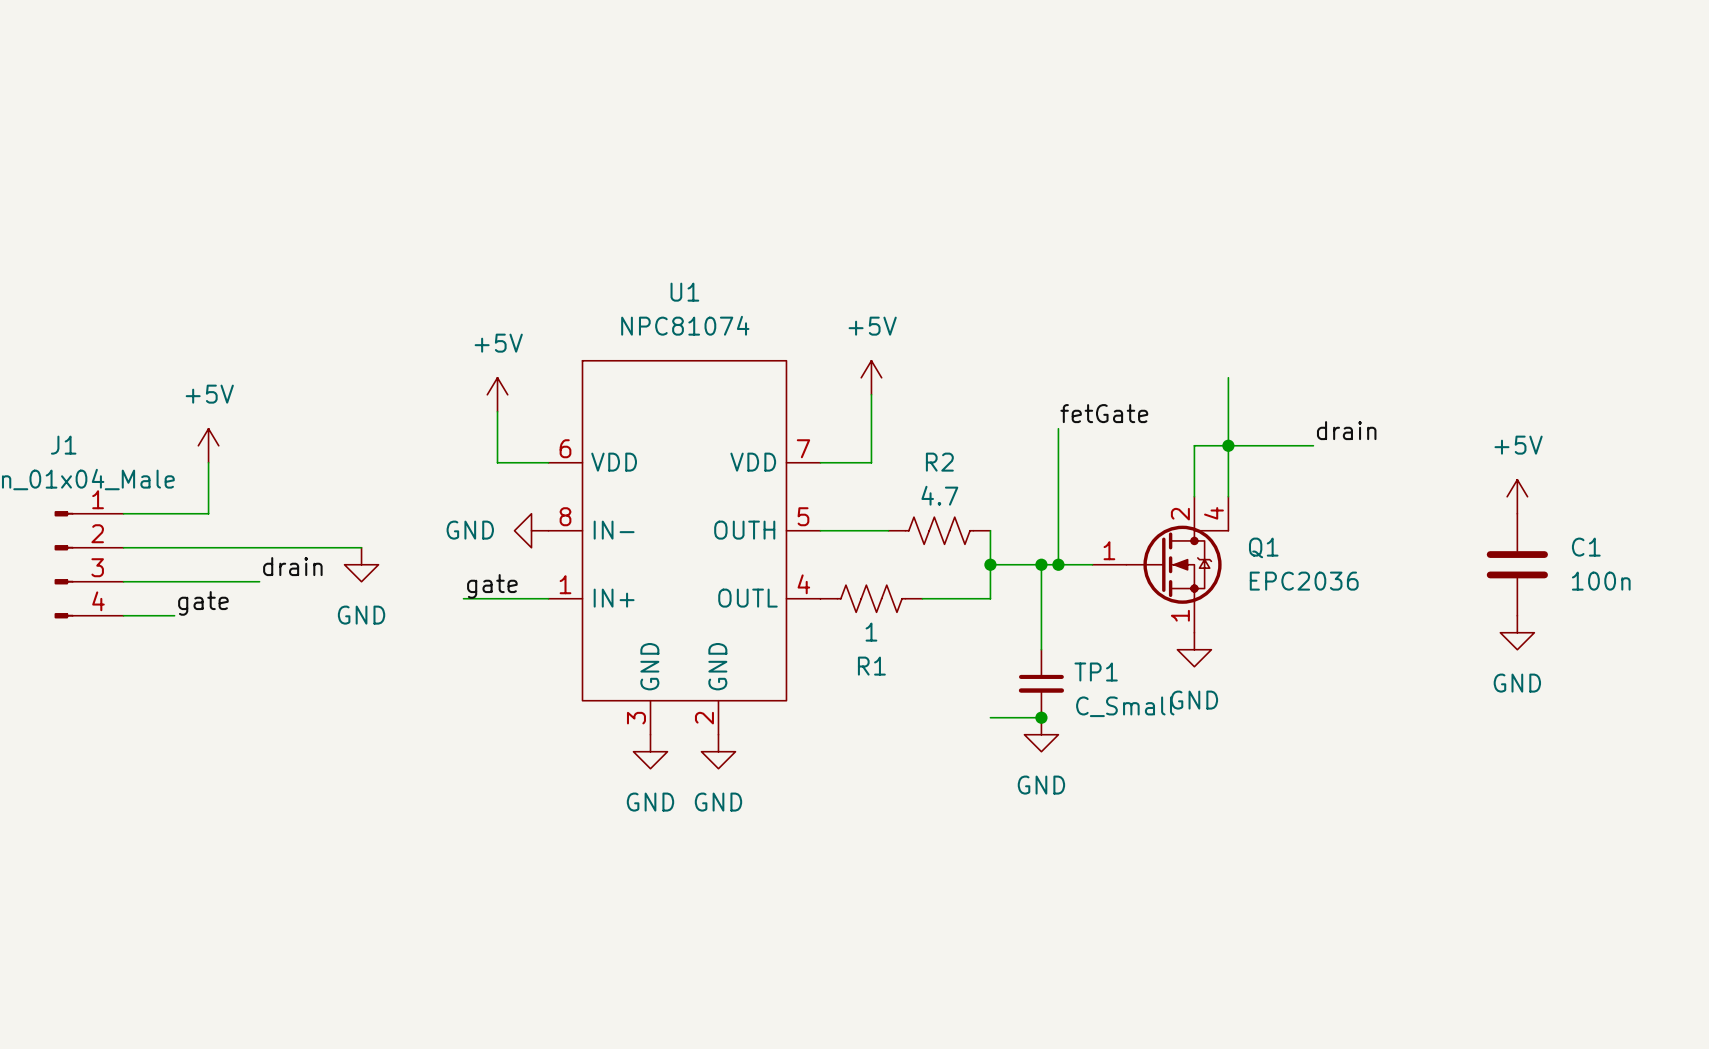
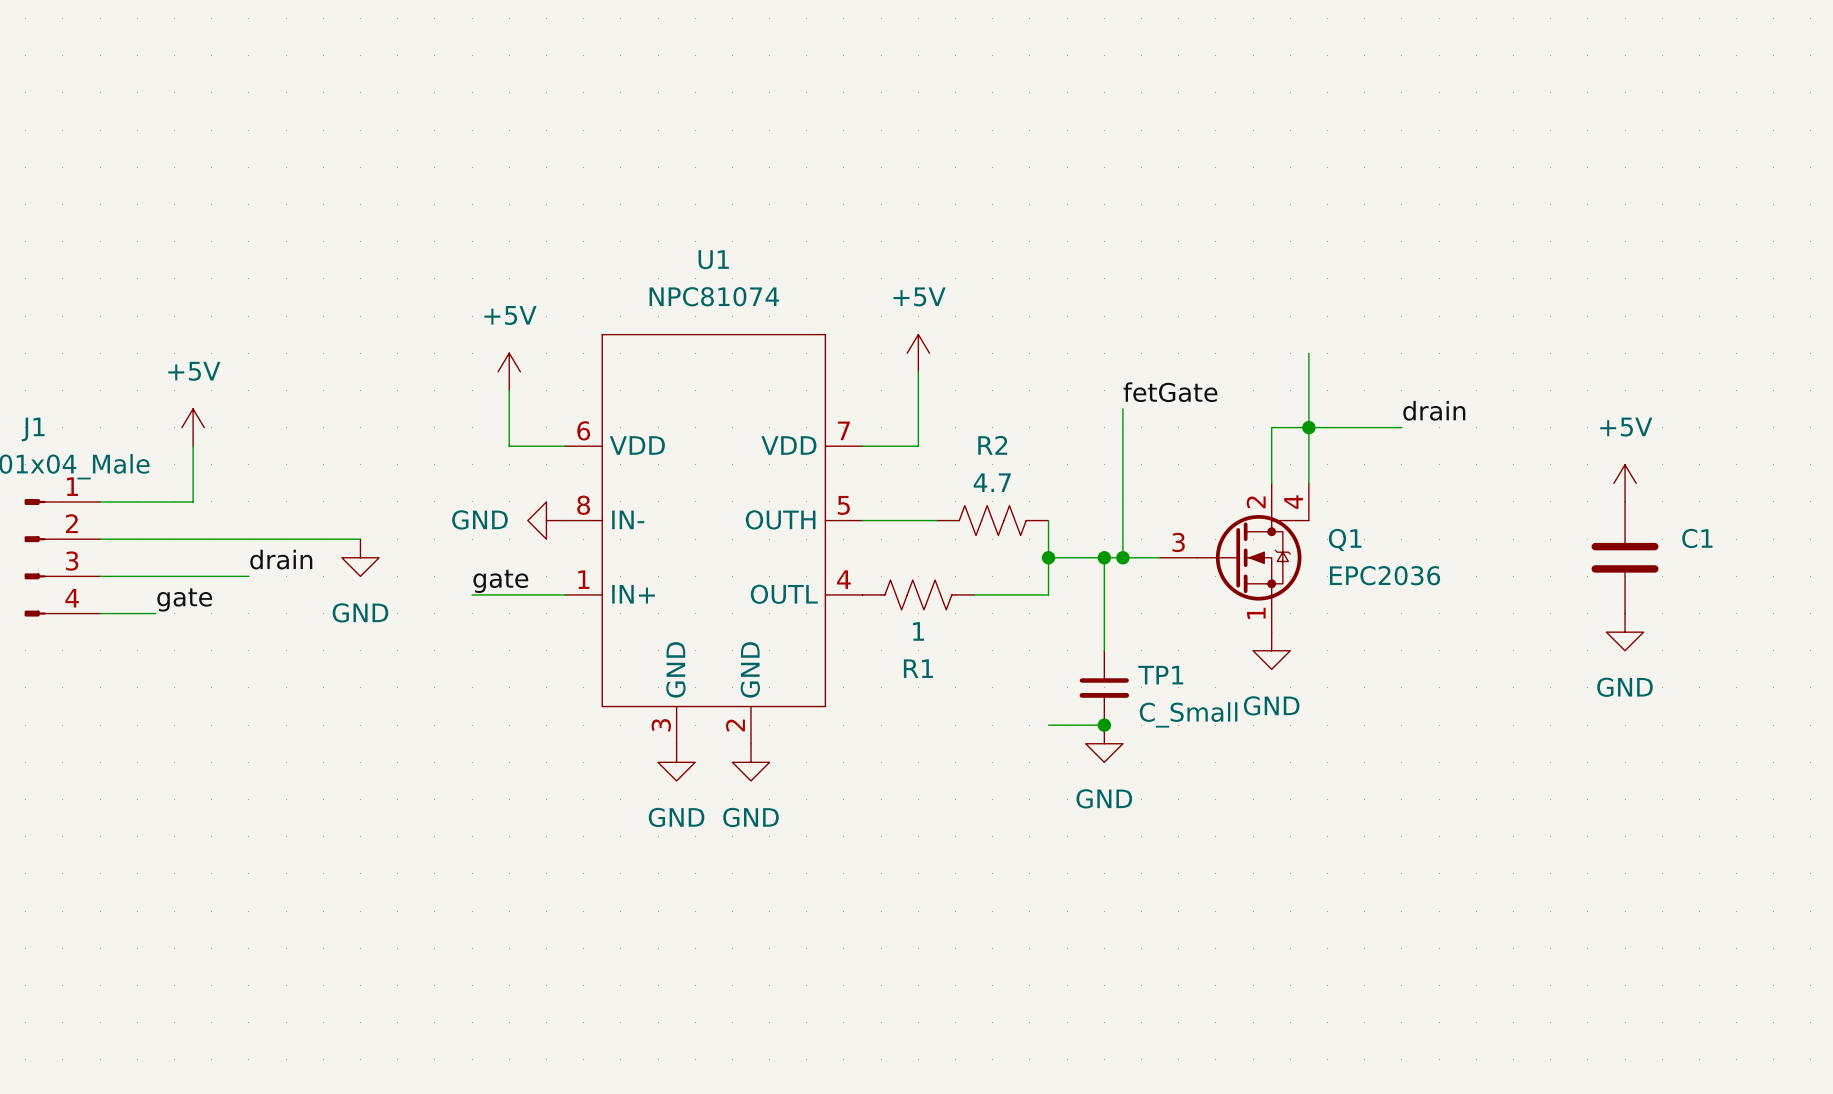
Q1 pin number: 1 (1109, 550) -> 3 (1178, 542)
C1 value: 100n (1601, 581) -> none

